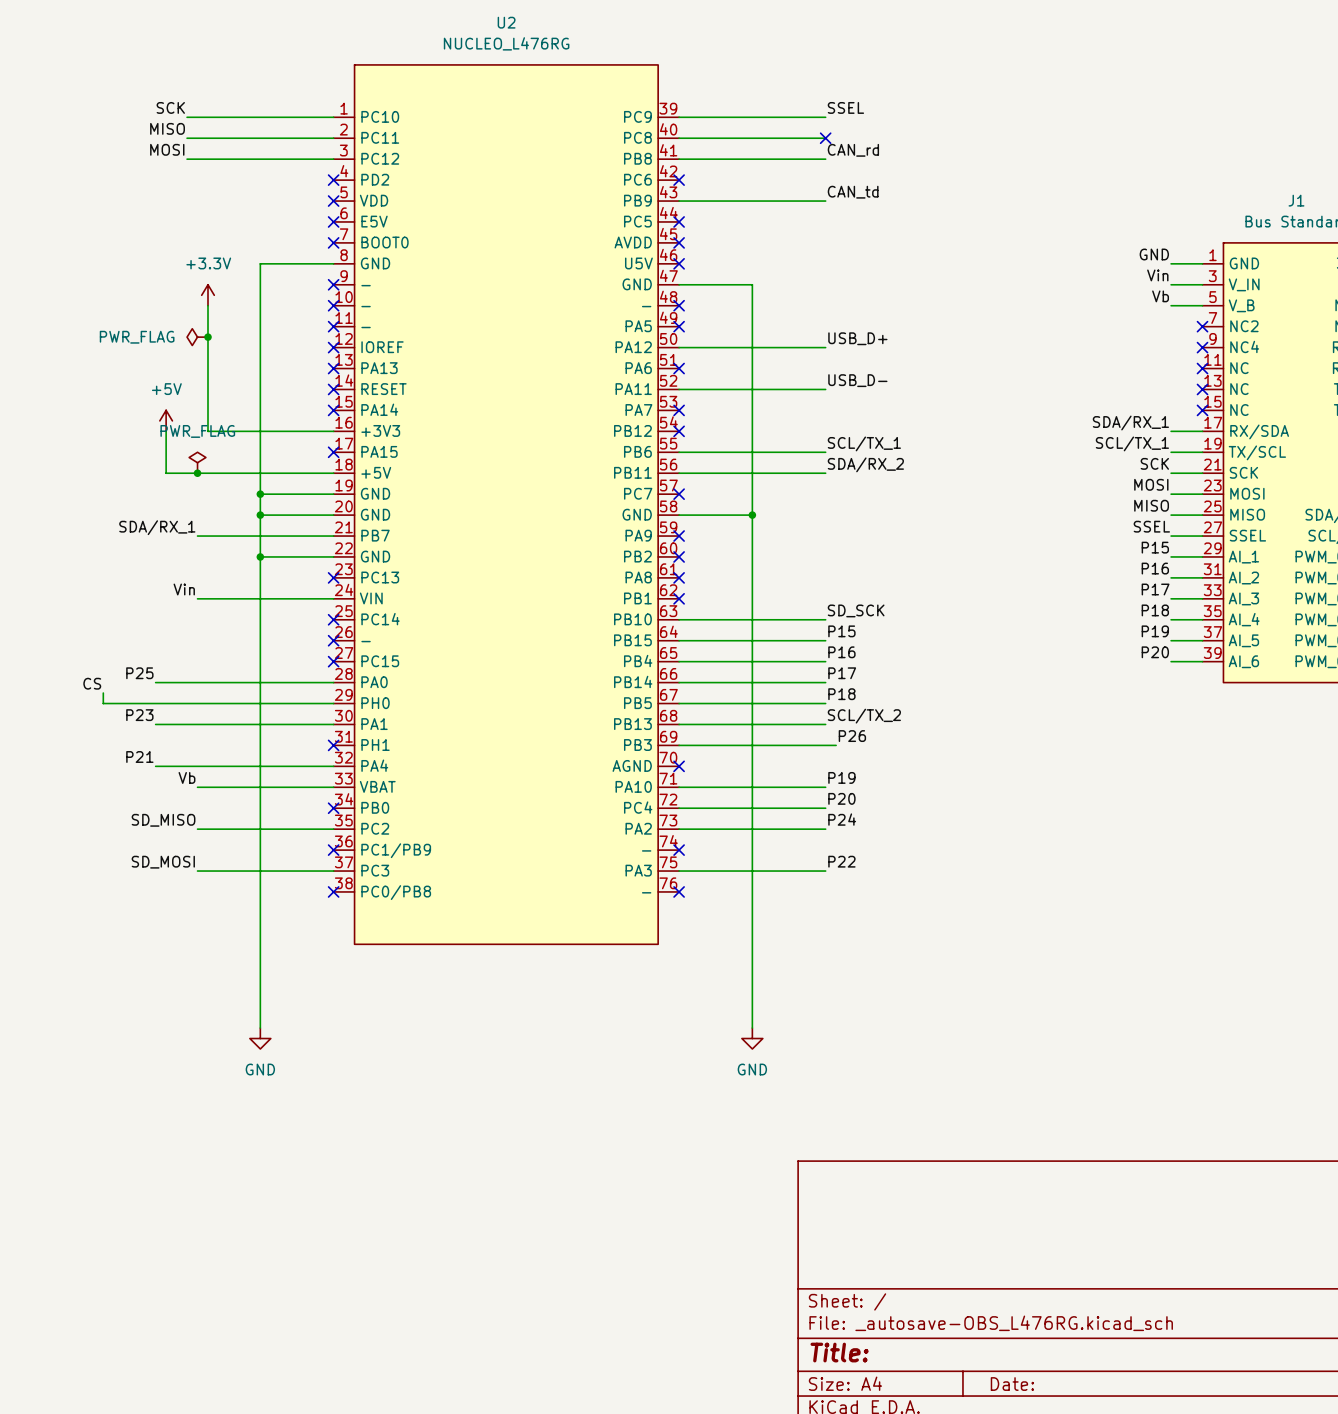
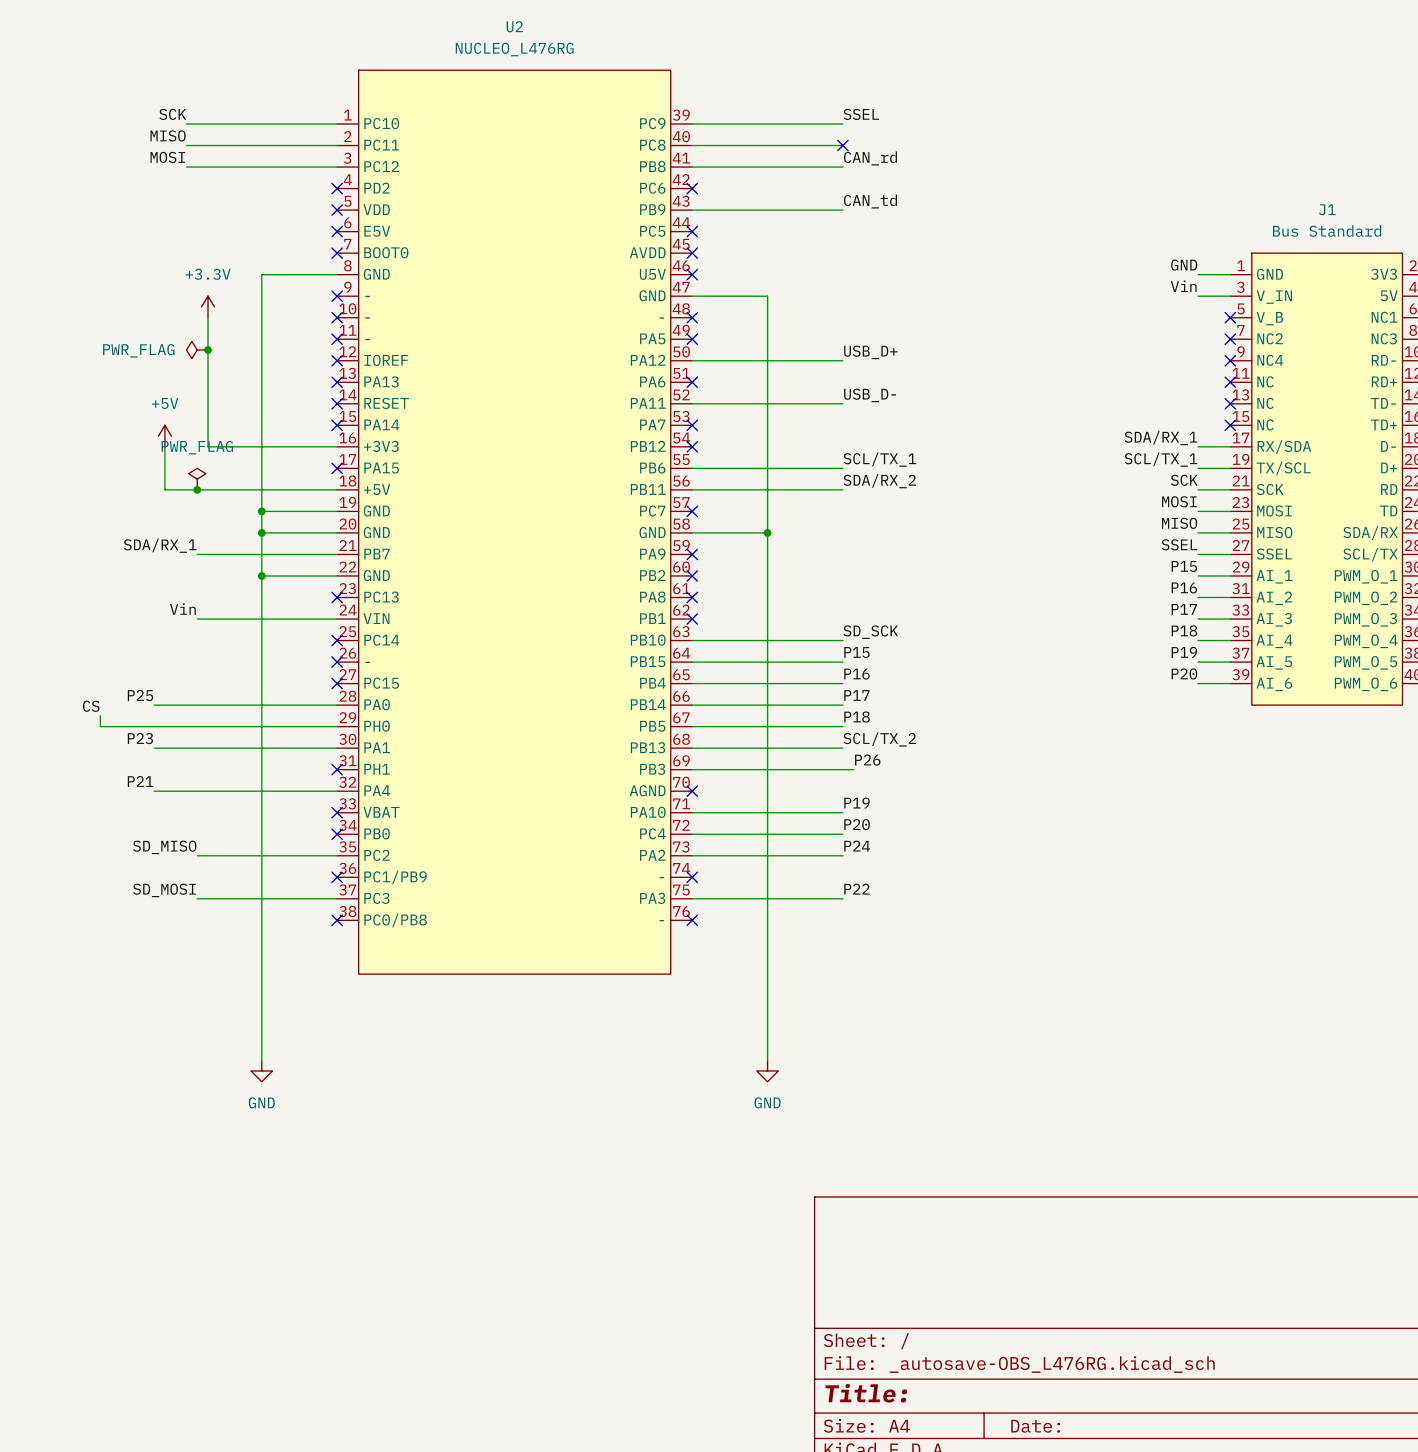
label: Vb (1160, 296) -> none
wire: (1171, 305) (1202, 305) -> none
no-connect mark: none -> (1230, 317)
label: Vb (186, 777) -> none
wire: (197, 787) (333, 787) -> none
no-connect mark: none -> (337, 812)

